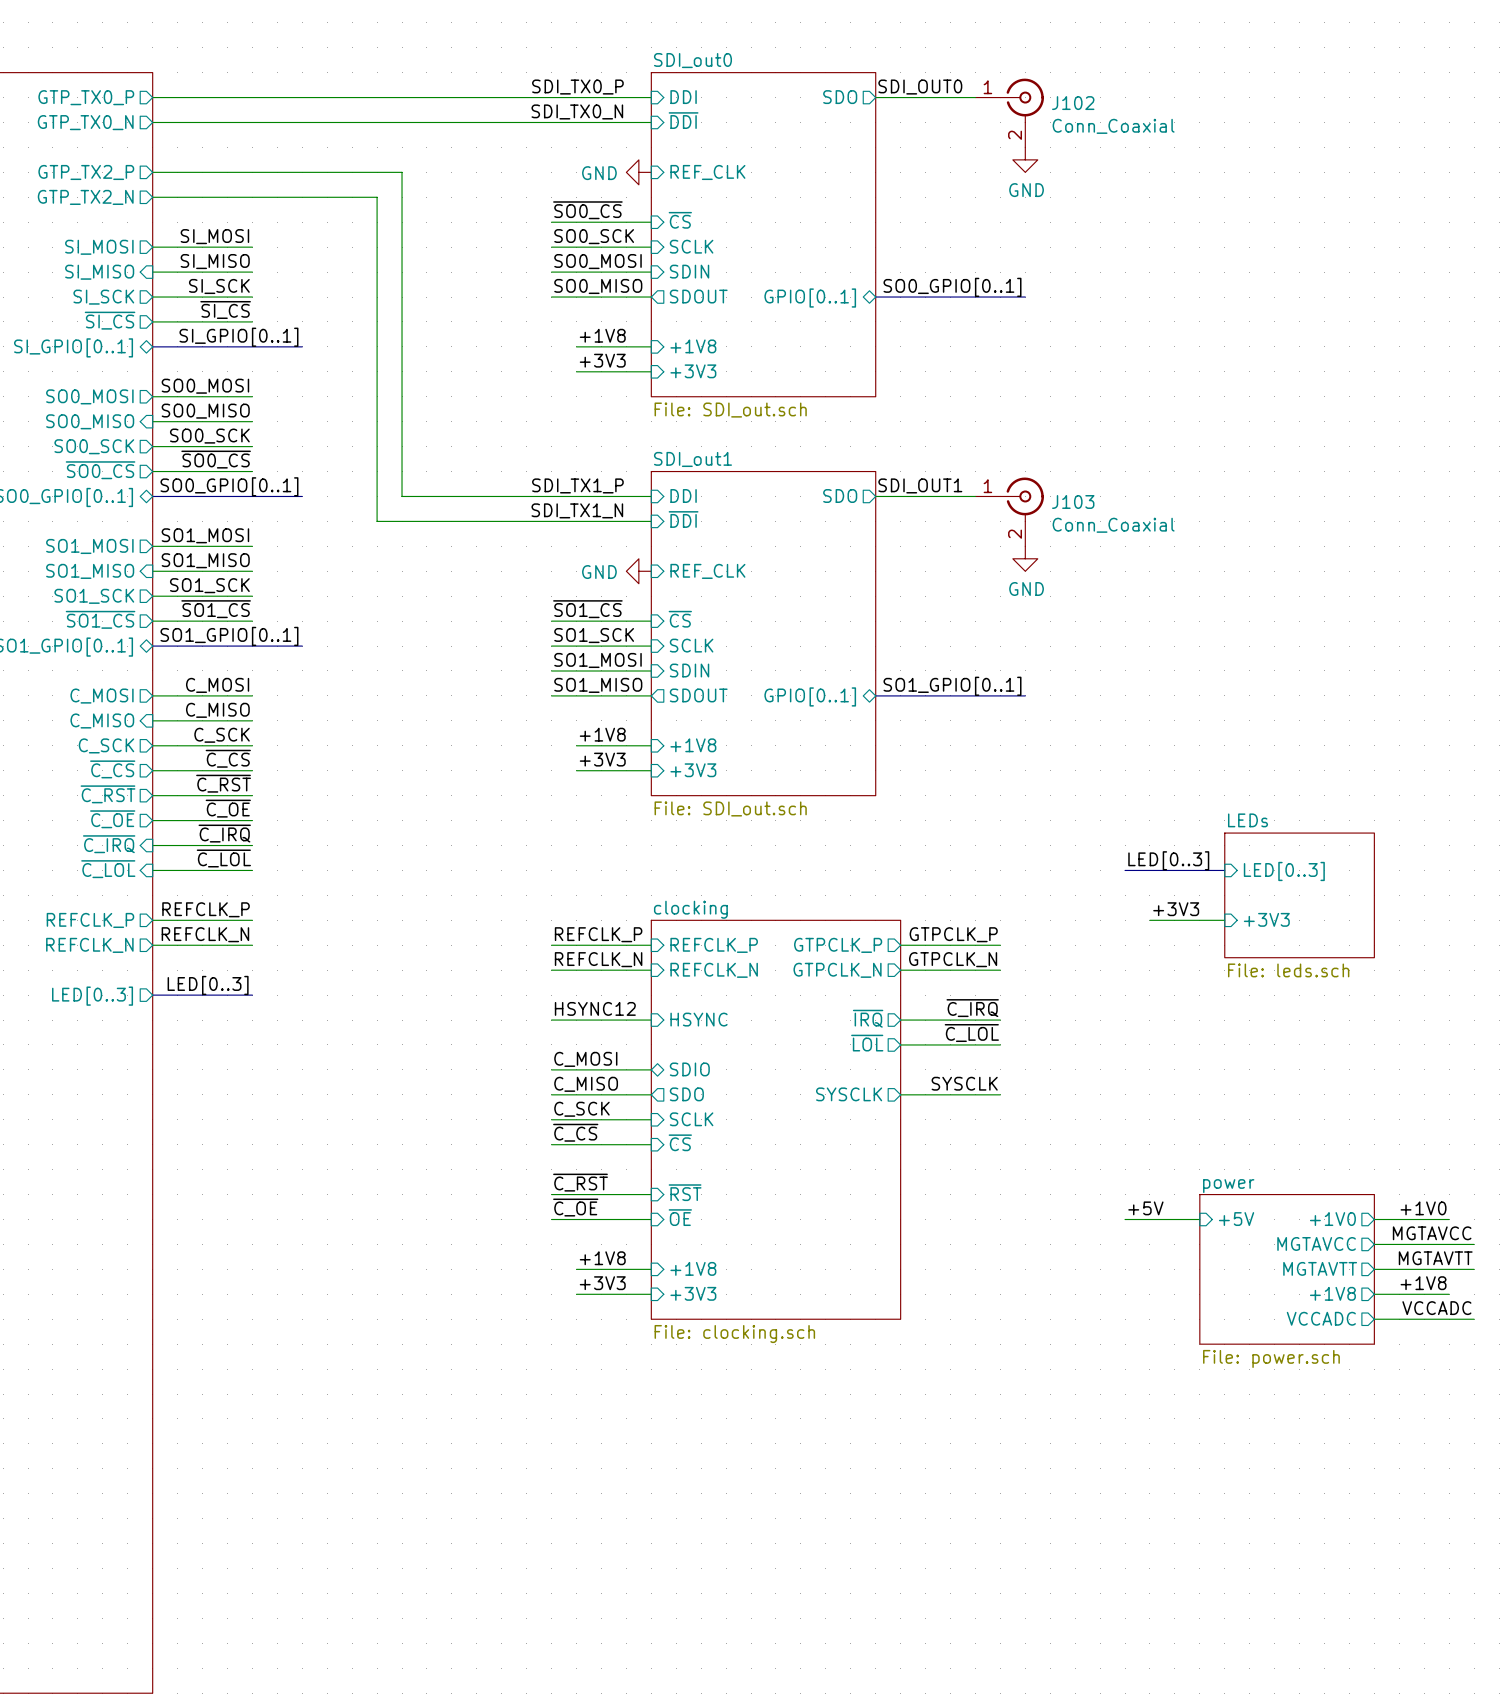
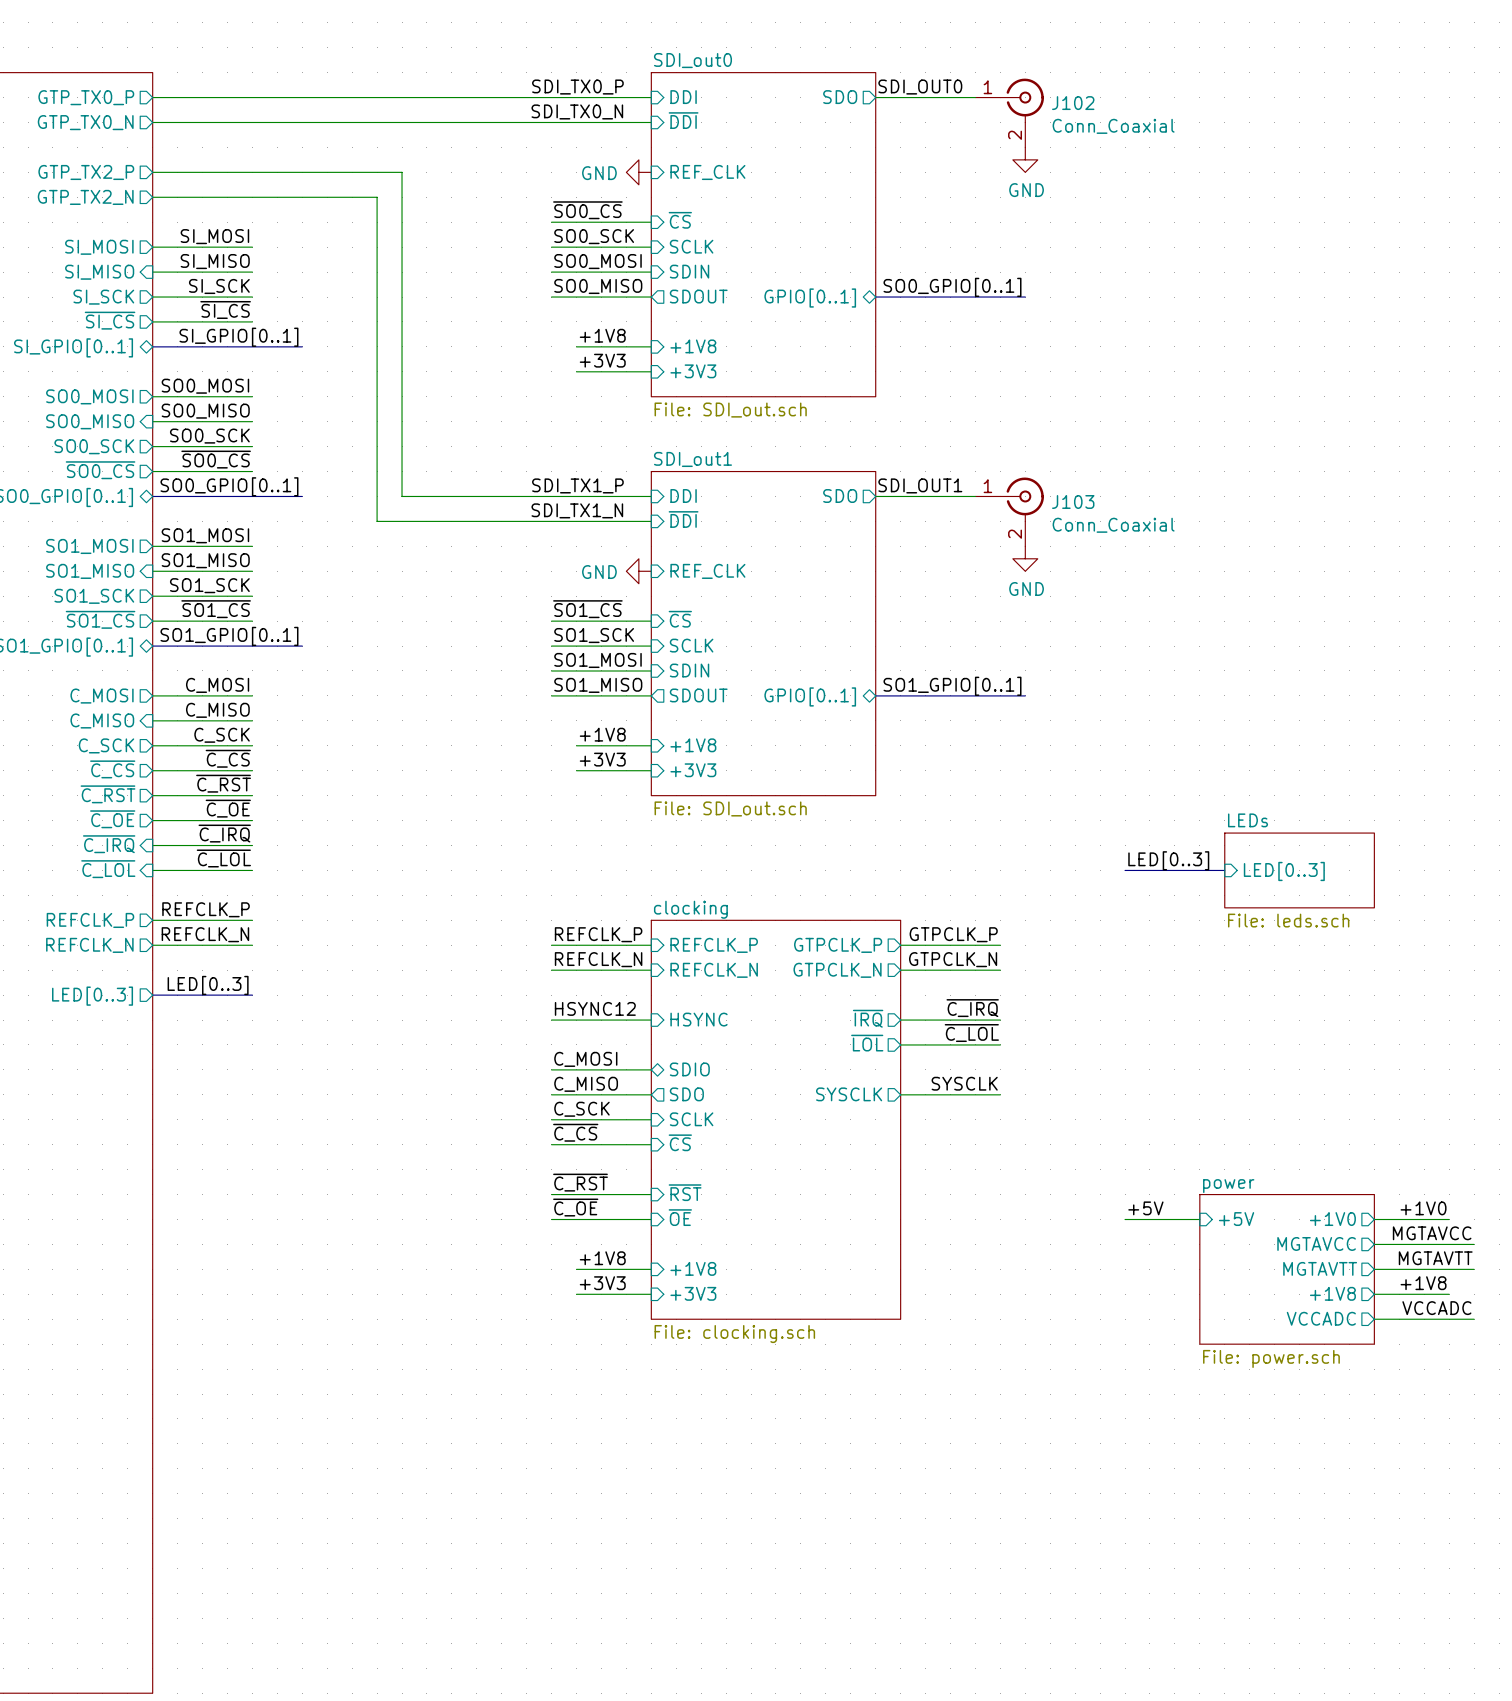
sheet LEDs: none -> File: leds.sch (1299, 870)
sheet LEDs: File: leds.sch (1299, 895) -> none
label: +3V3 (1176, 909) -> none
sheet pin: +3V3 (1266, 919) -> none
wire: (1149, 920) (1224, 920) -> none

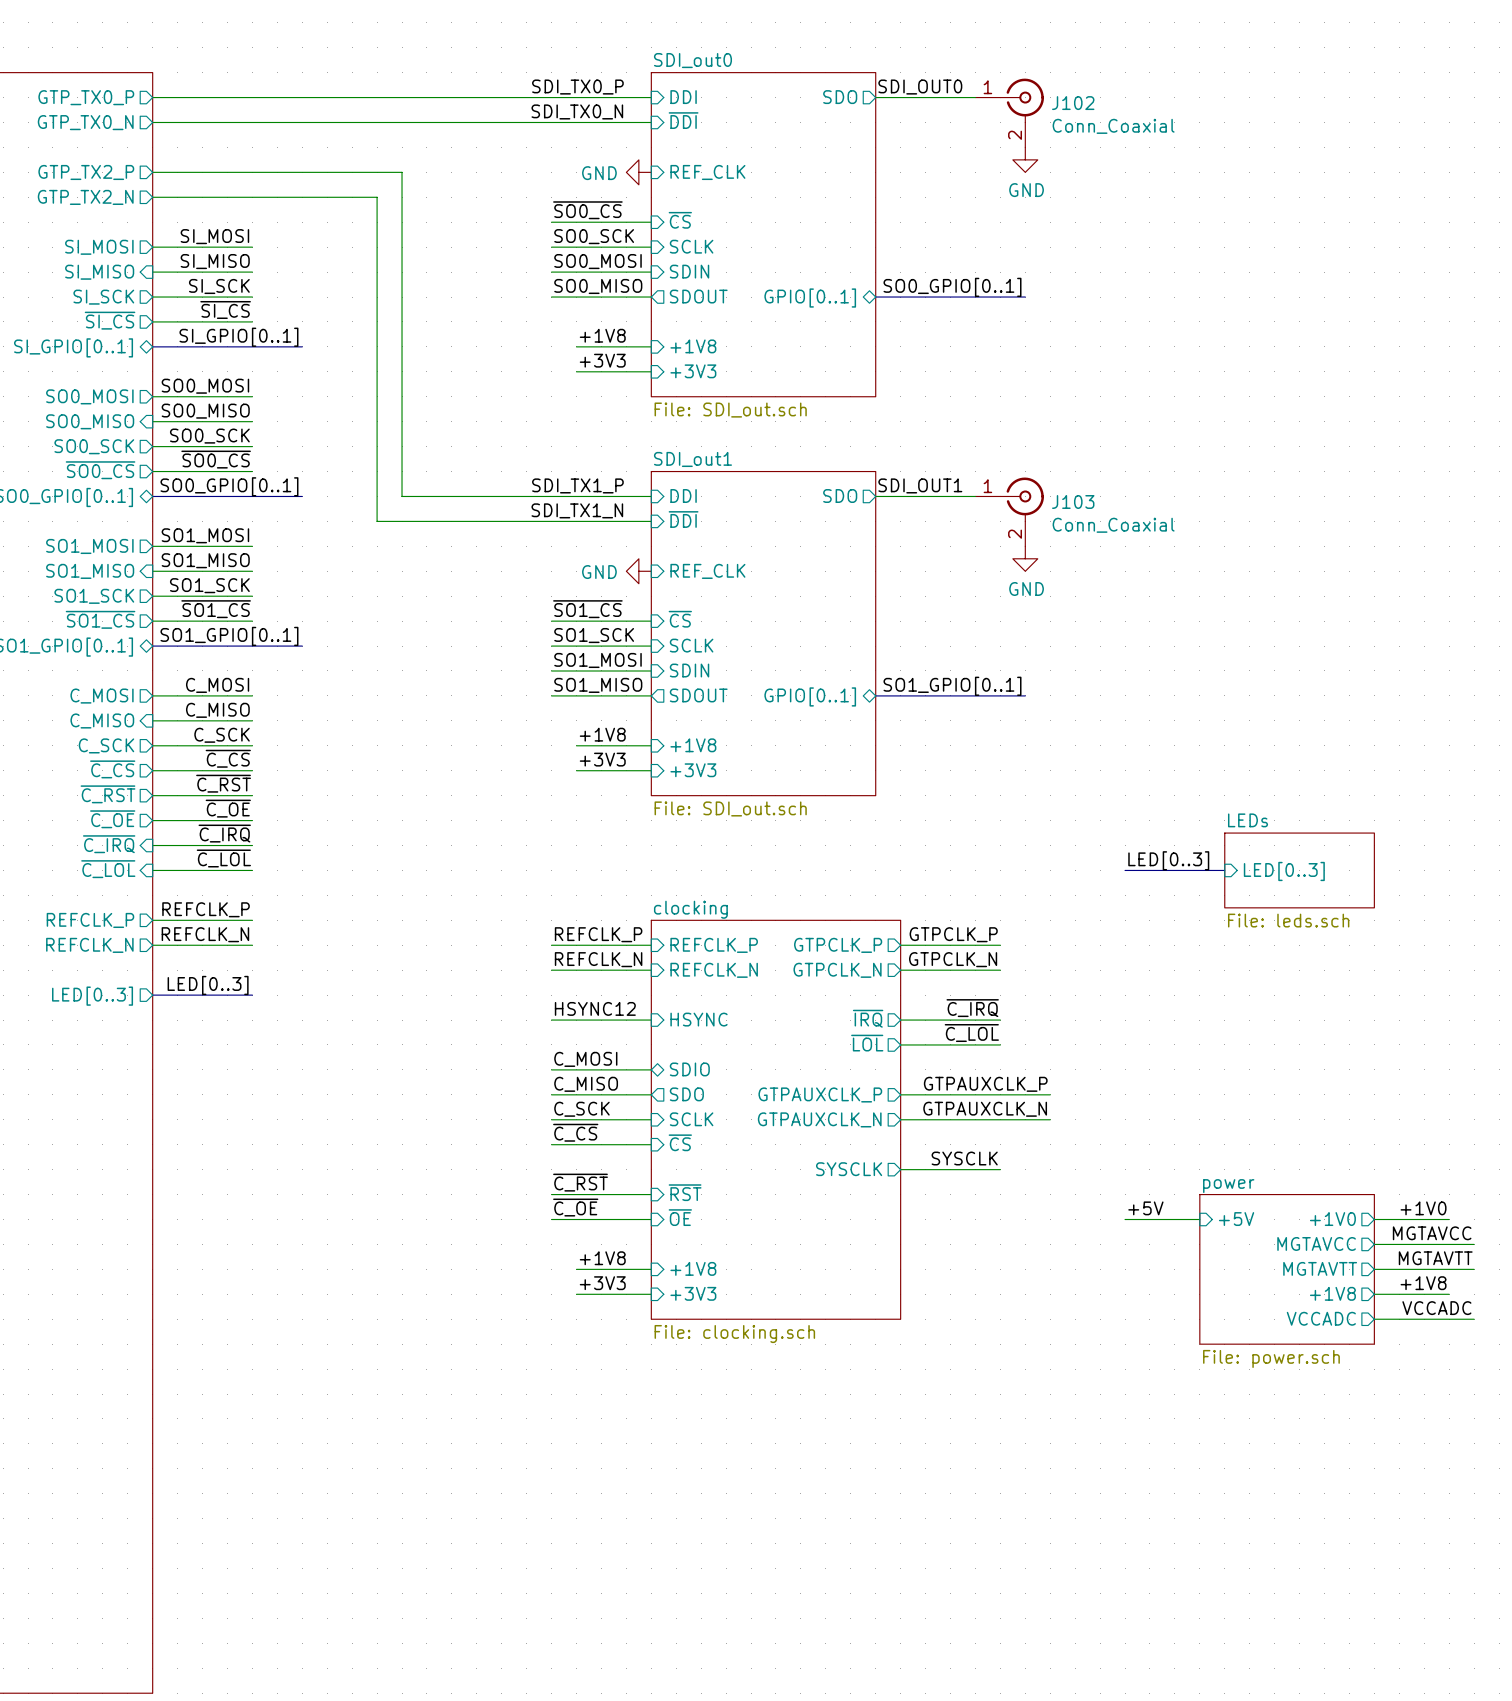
label position: SYSCLK (964, 1083) -> SYSCLK (964, 1158)
label: none -> GTPAUXCLK_P (985, 1084)
sheet pin: SYSCLK (849, 1094) -> GTPAUXCLK_P (820, 1094)
wire: none -> (1000, 1094) (1050, 1094)
label: none -> GTPAUXCLK_N (985, 1109)
sheet pin: none -> GTPAUXCLK_N (819, 1119)
wire: none -> (900, 1119) (1050, 1119)
sheet pin: none -> SYSCLK (849, 1169)
wire: none -> (900, 1169) (1000, 1169)

